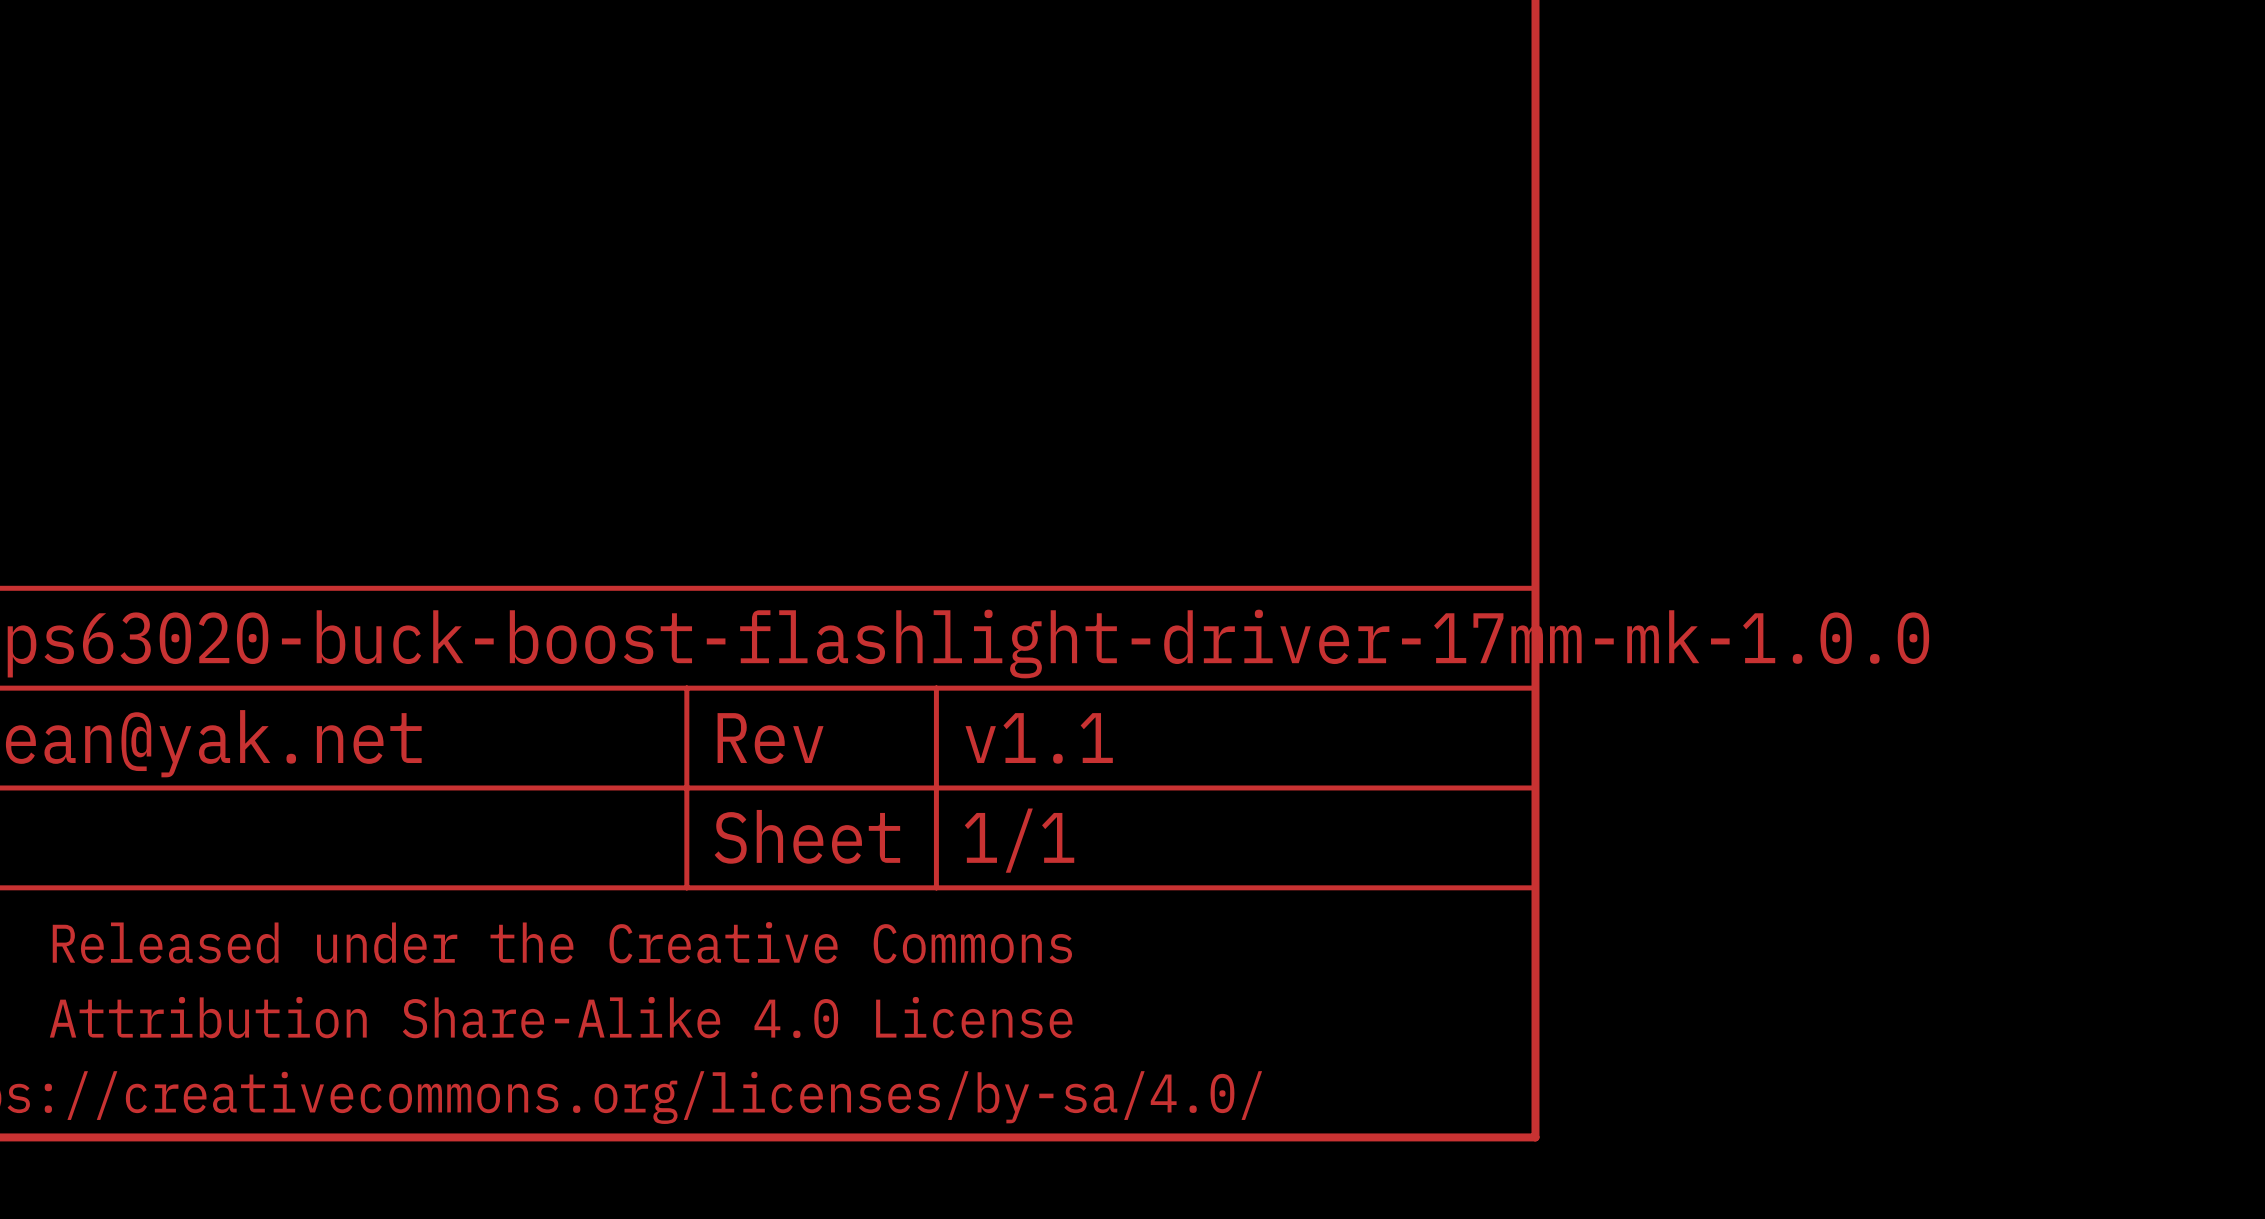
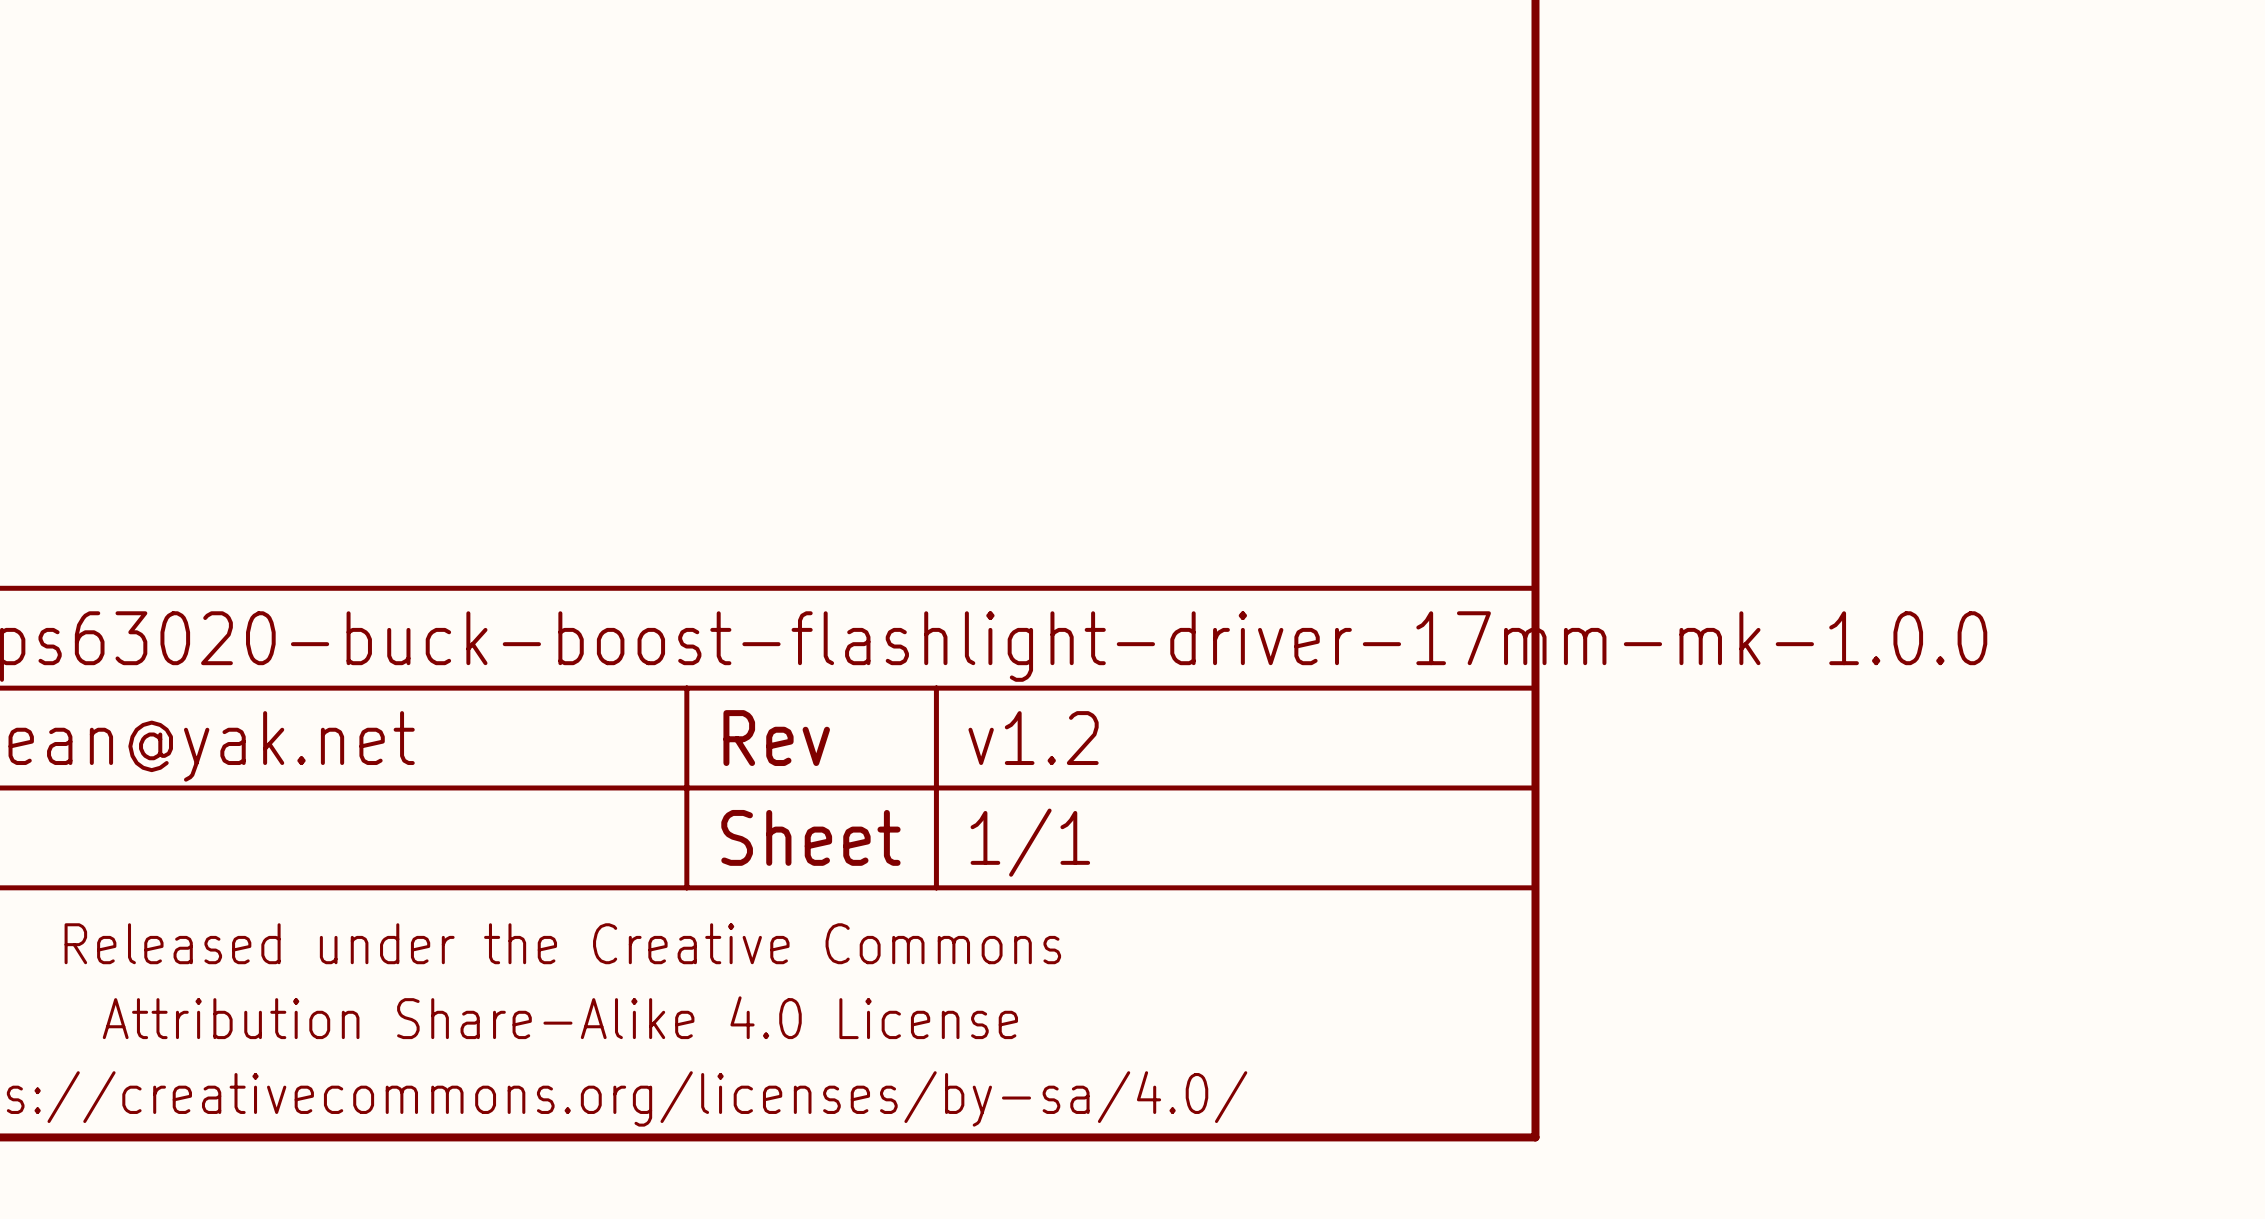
part text: v1.1 (1039, 738) -> v1.2 (1033, 738)

